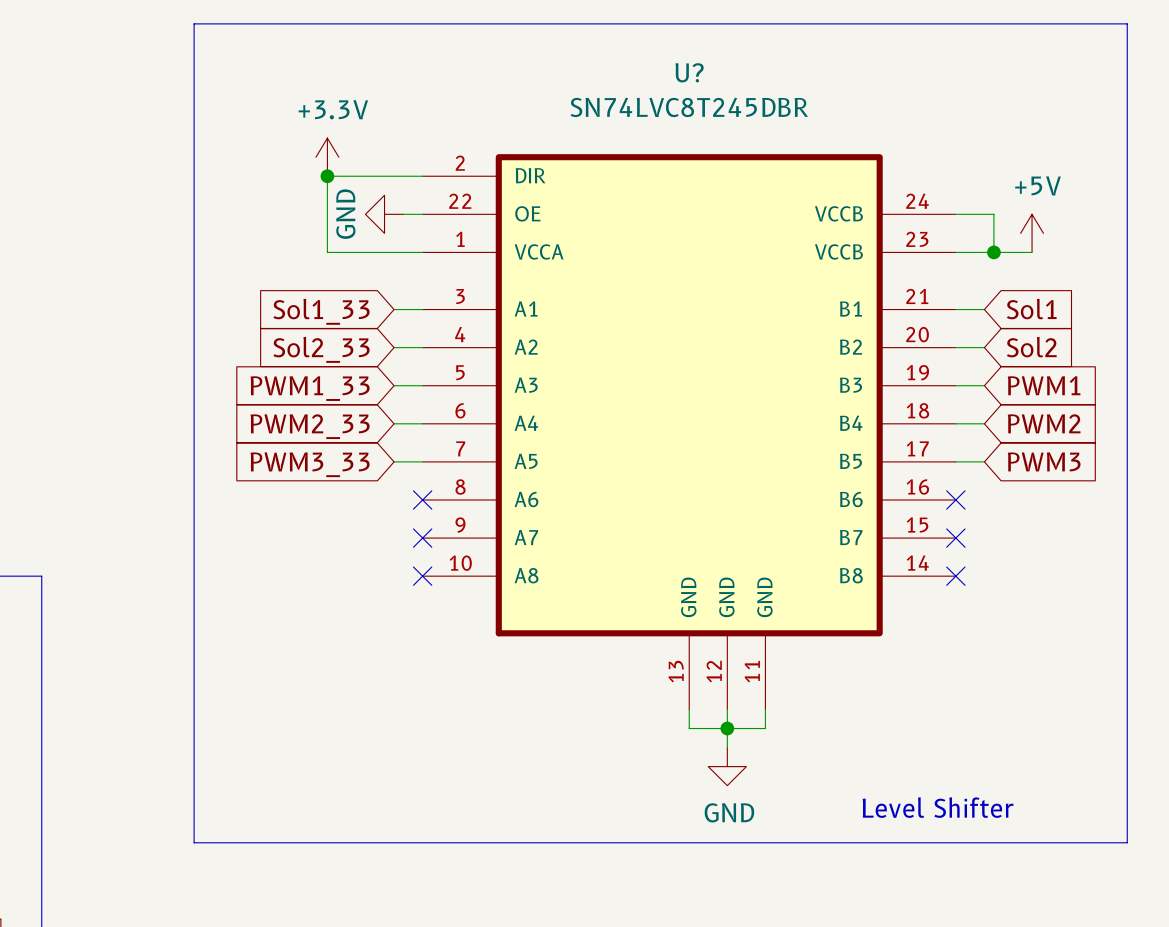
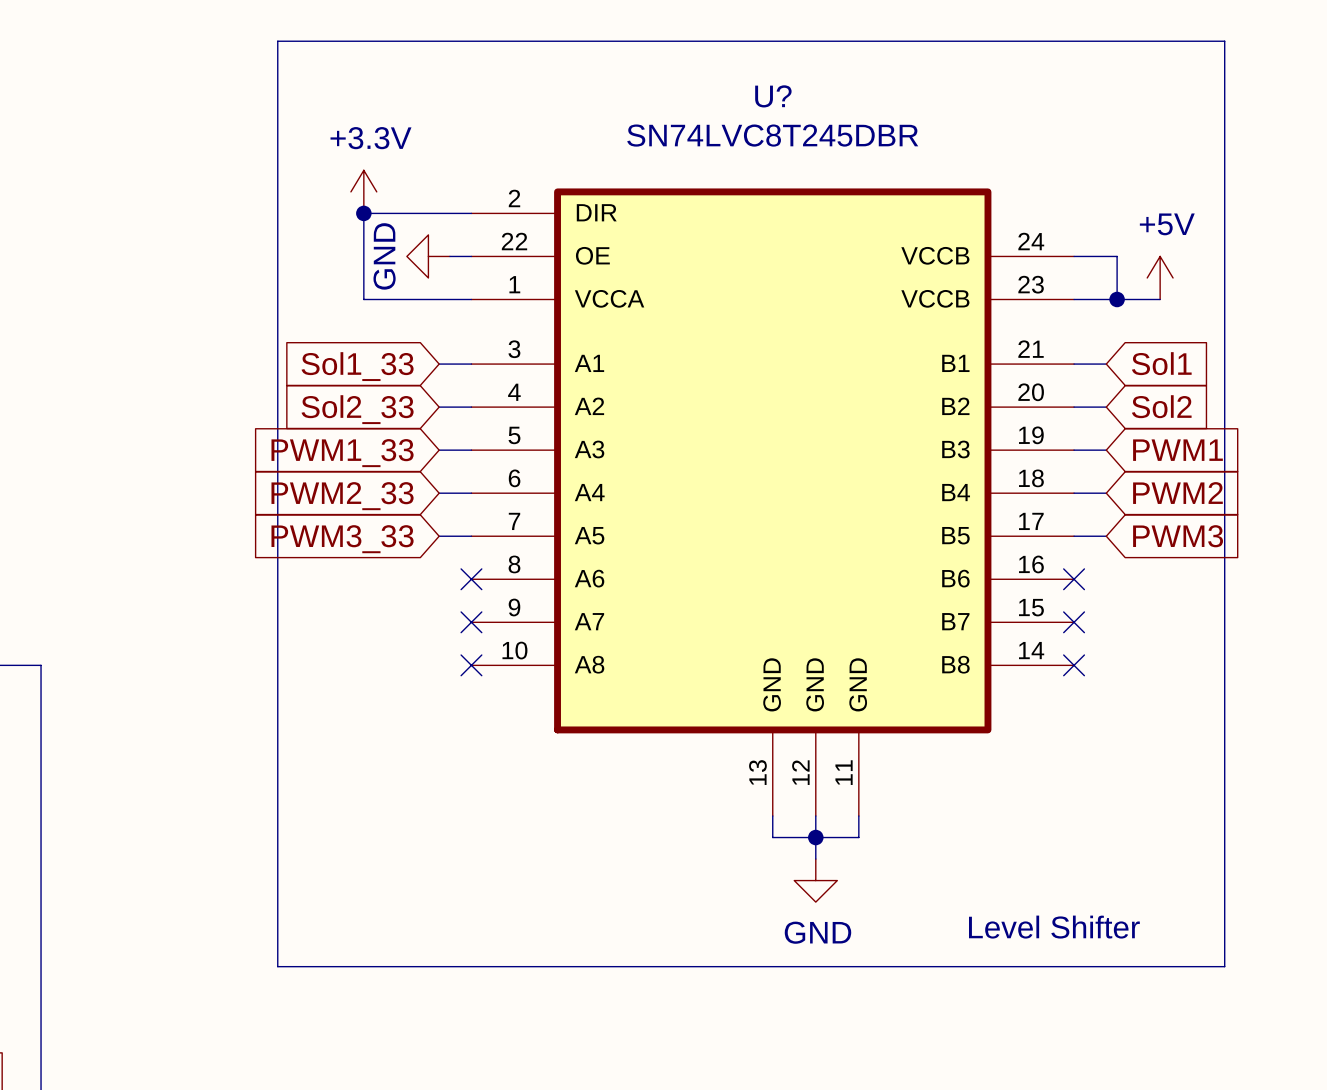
line: (251, 23) (194, 23) (194, 842) (251, 842) -> (277, 41) (277, 966)
line: (1089, 23) (1127, 23) (1127, 842) (1089, 842) -> (1224, 41) (1224, 966)

